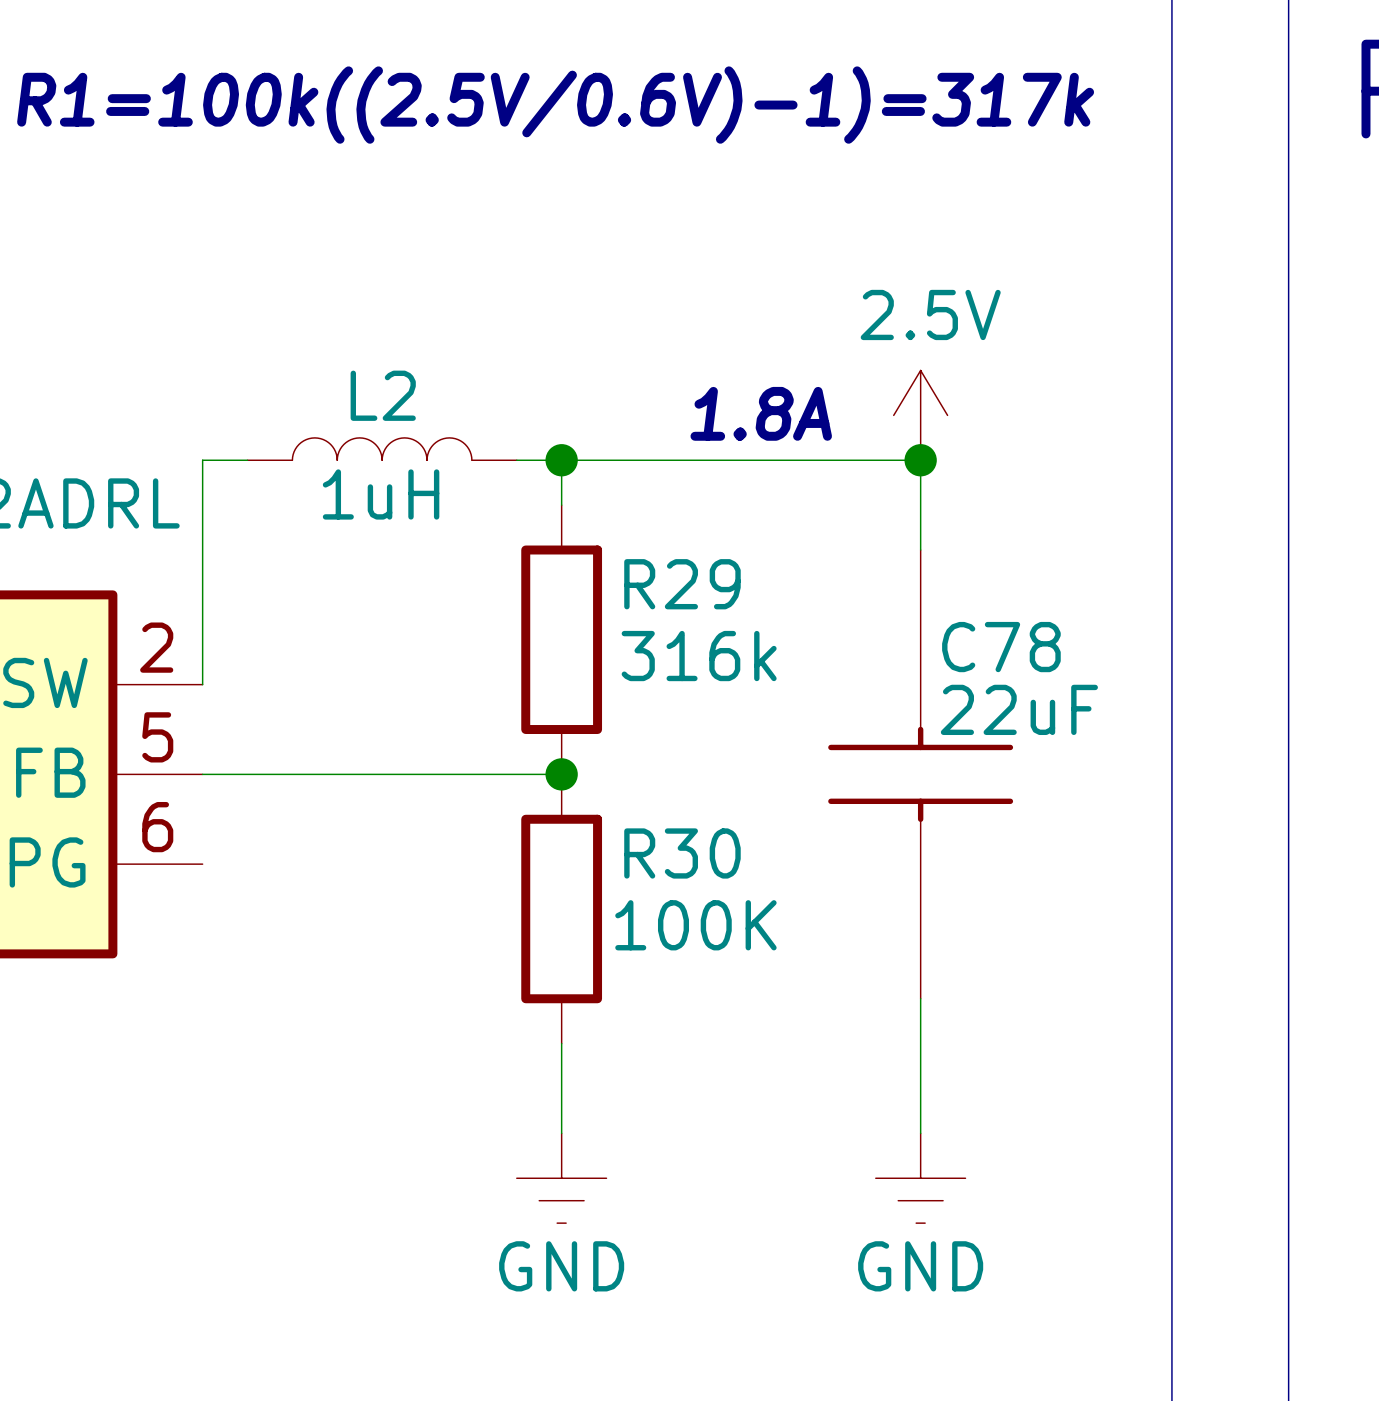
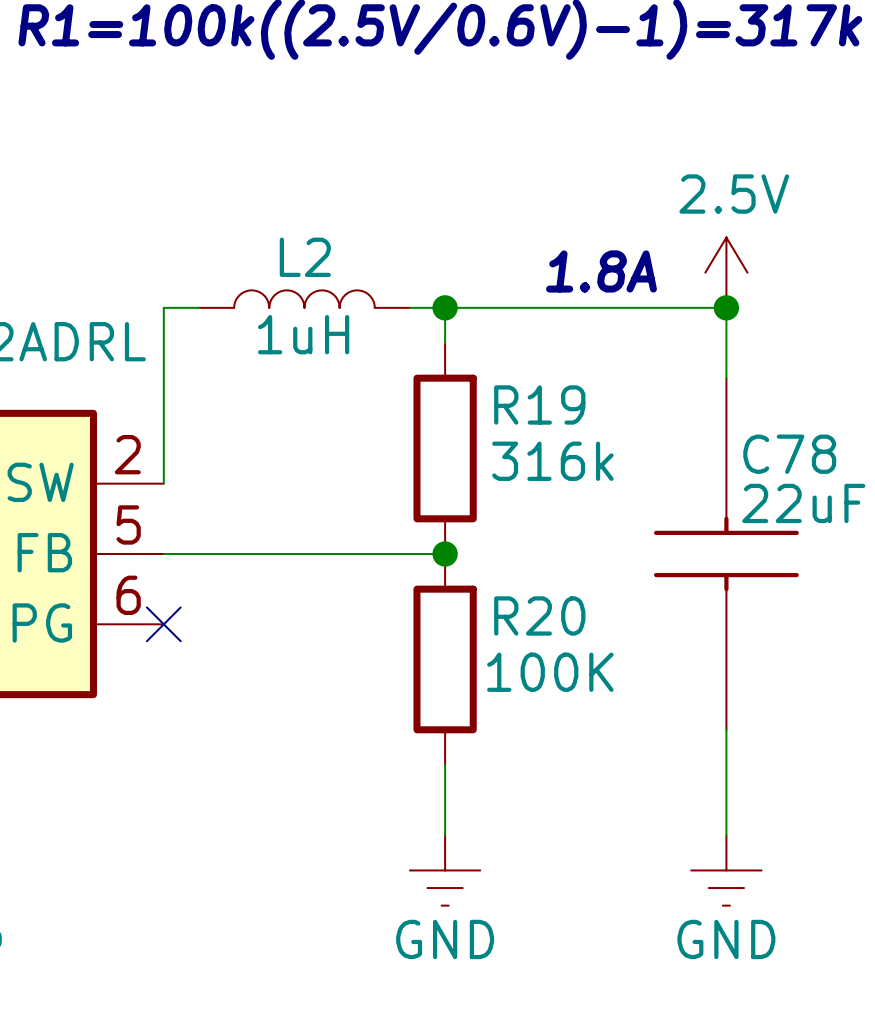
R29 name: R29 (682, 584) -> R19 (539, 404)
R30 name: R30 (682, 853) -> R20 (539, 615)
no-connect mark: none -> (163, 624)

